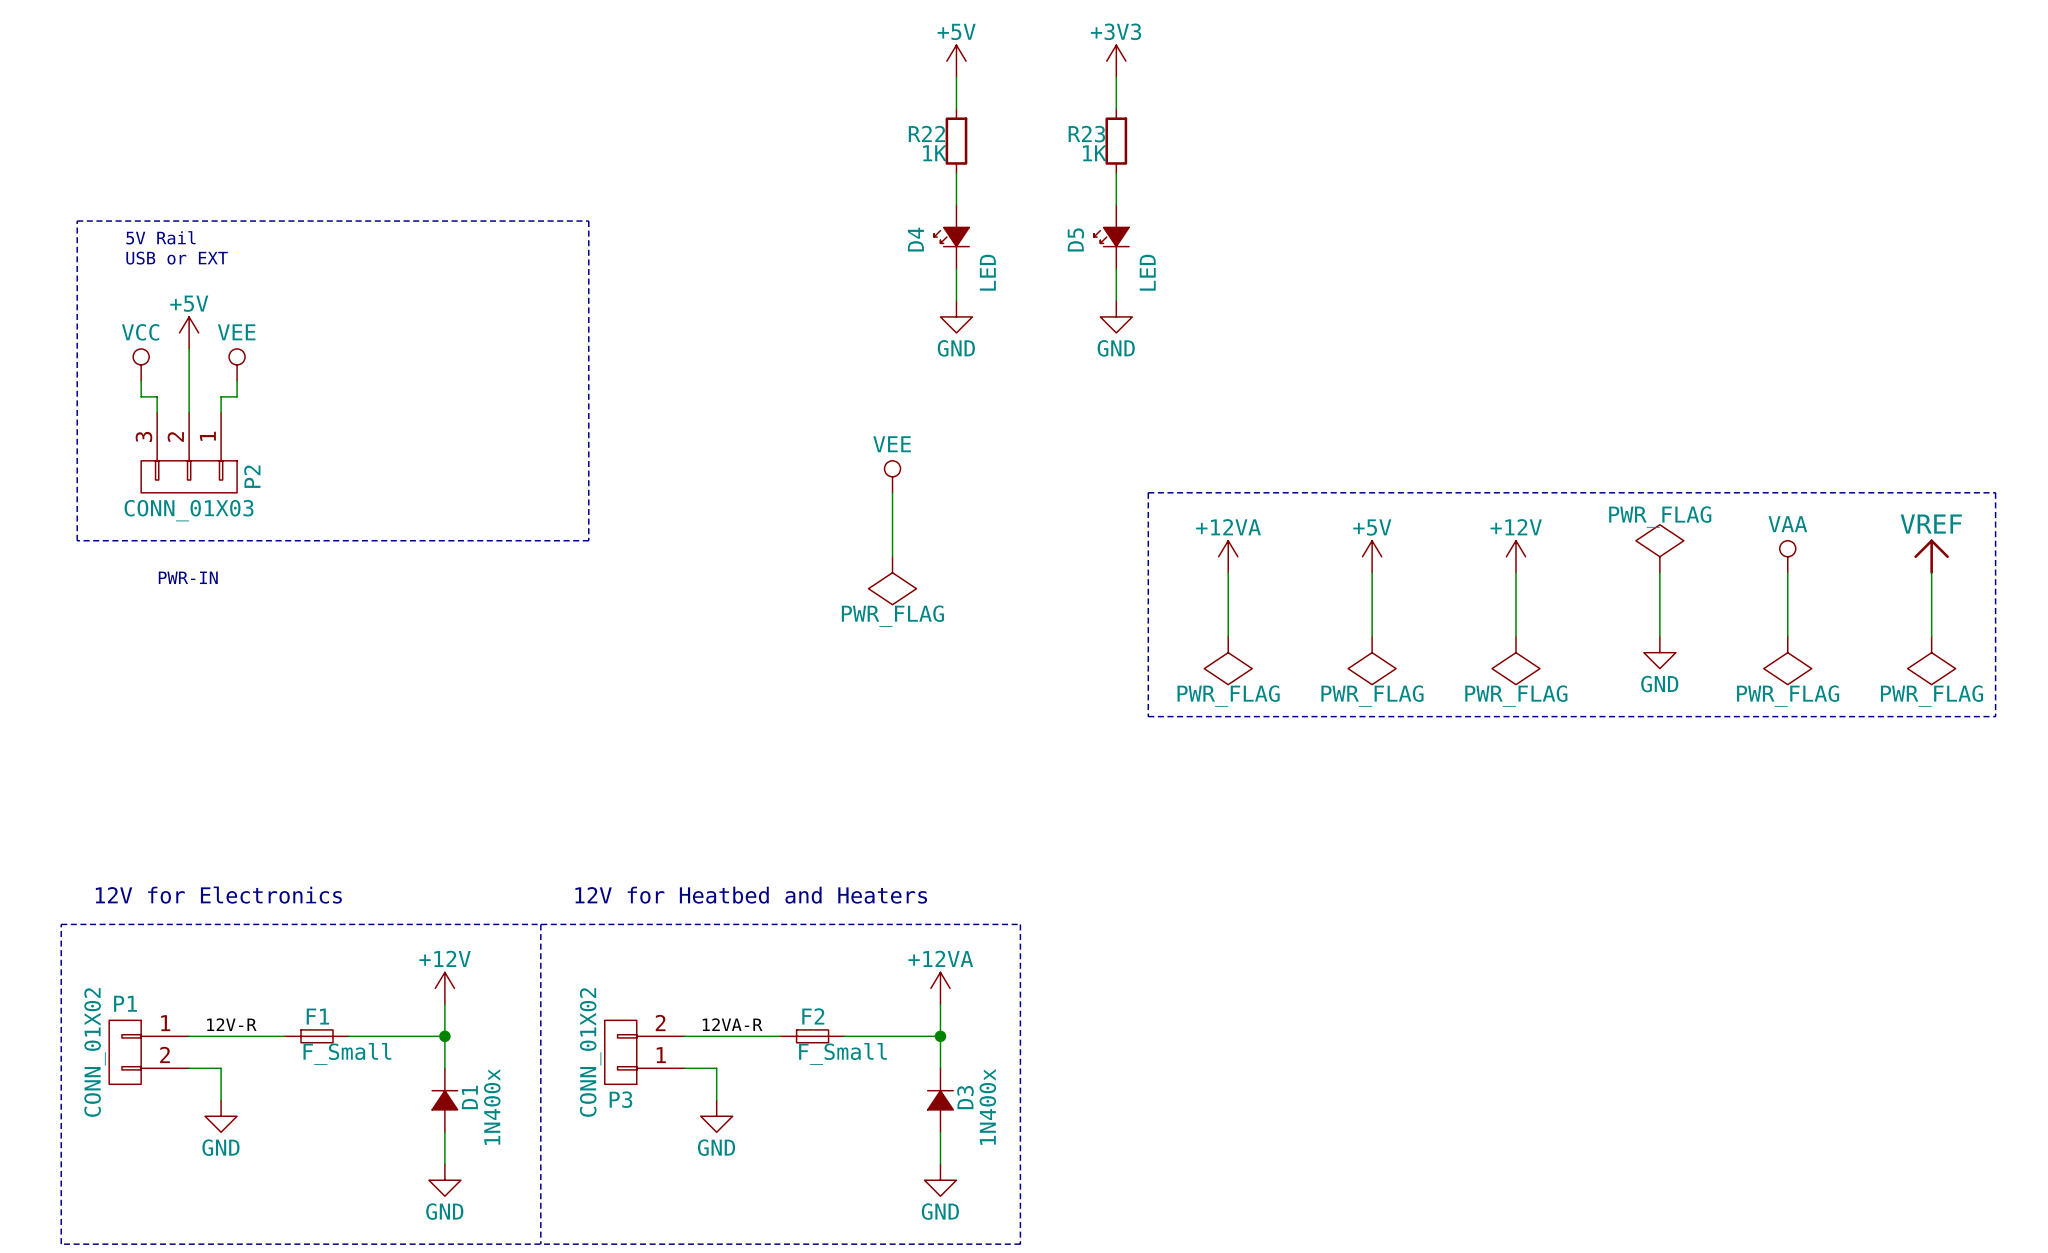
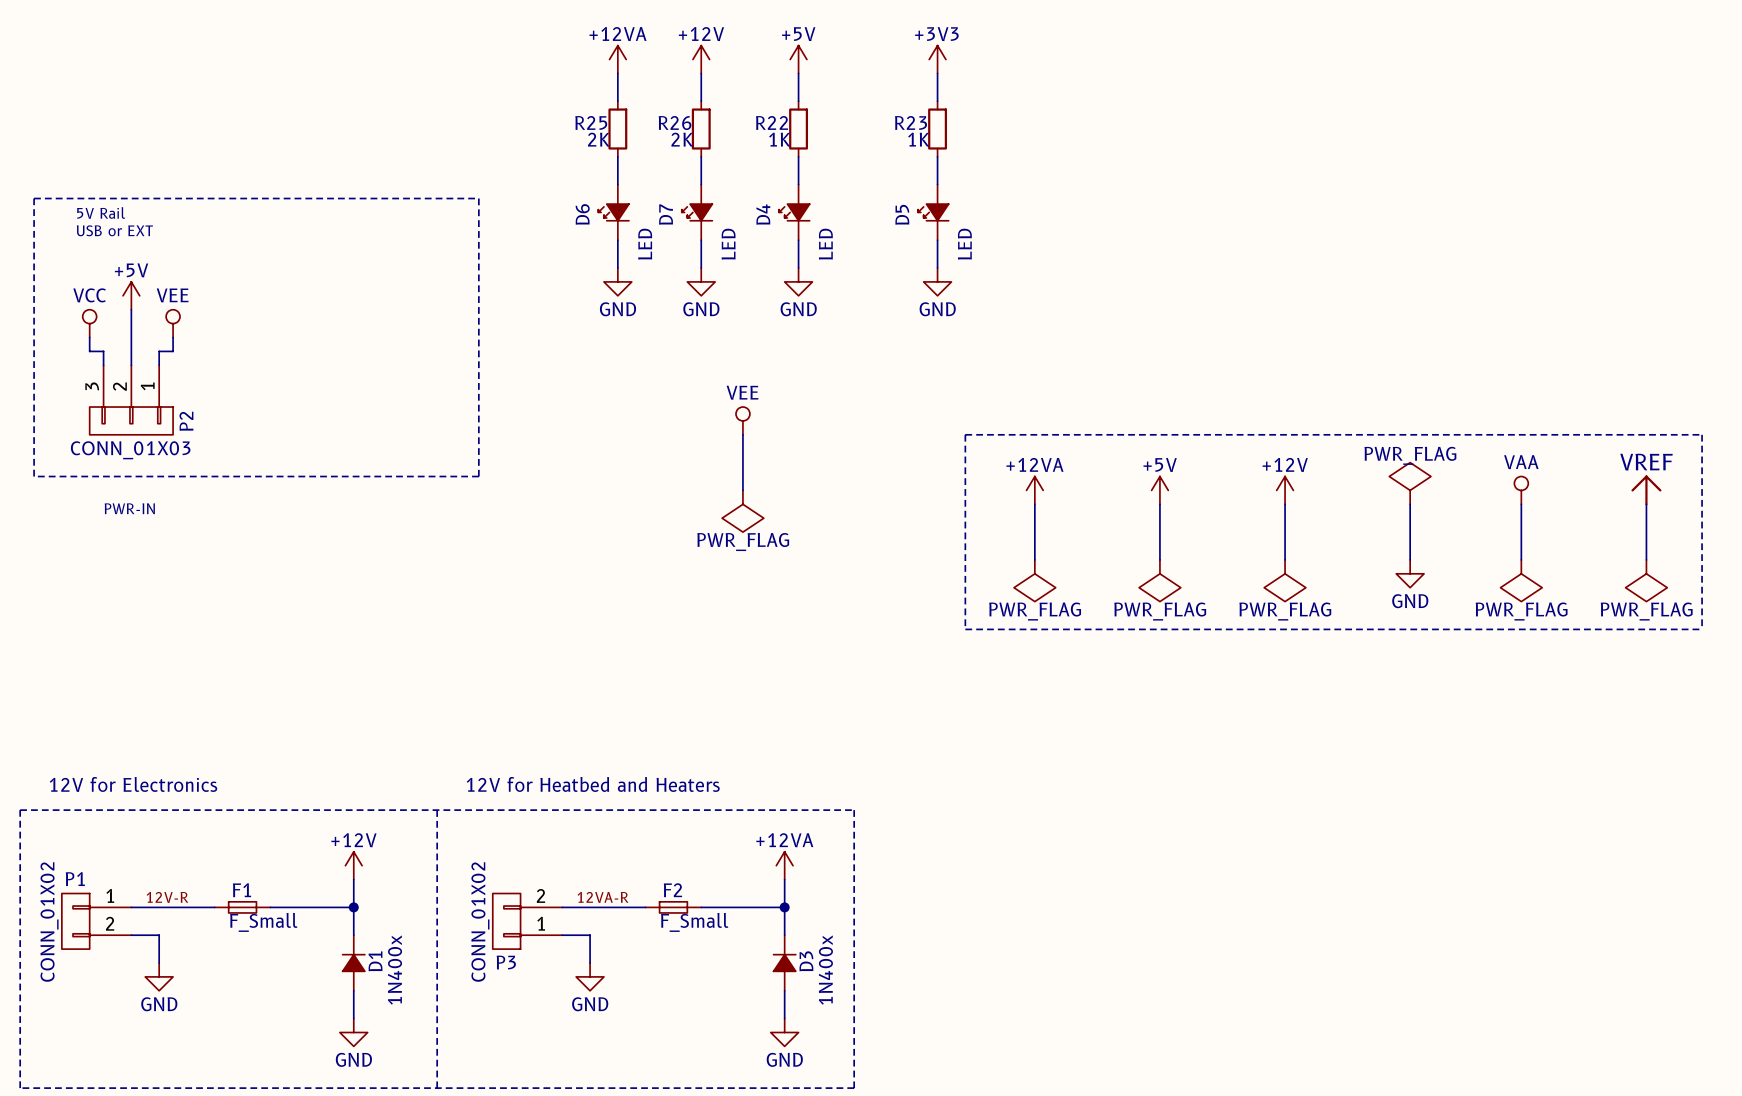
power symbol: none -> +12VA (617, 59)
power symbol: none -> +12V (701, 59)
wire: none -> (617, 73) (617, 101)
wire: none -> (701, 73) (701, 101)
R25: none -> 2K (617, 129)
R26: none -> 2K (701, 129)
wire: none -> (617, 156) (617, 184)
wire: none -> (701, 156) (701, 184)
D6: none -> LED (613, 212)
D7: none -> LED (697, 212)
wire: none -> (617, 240) (617, 268)
wire: none -> (701, 240) (701, 268)
power symbol: none -> GND (617, 281)
power symbol: none -> GND (701, 281)

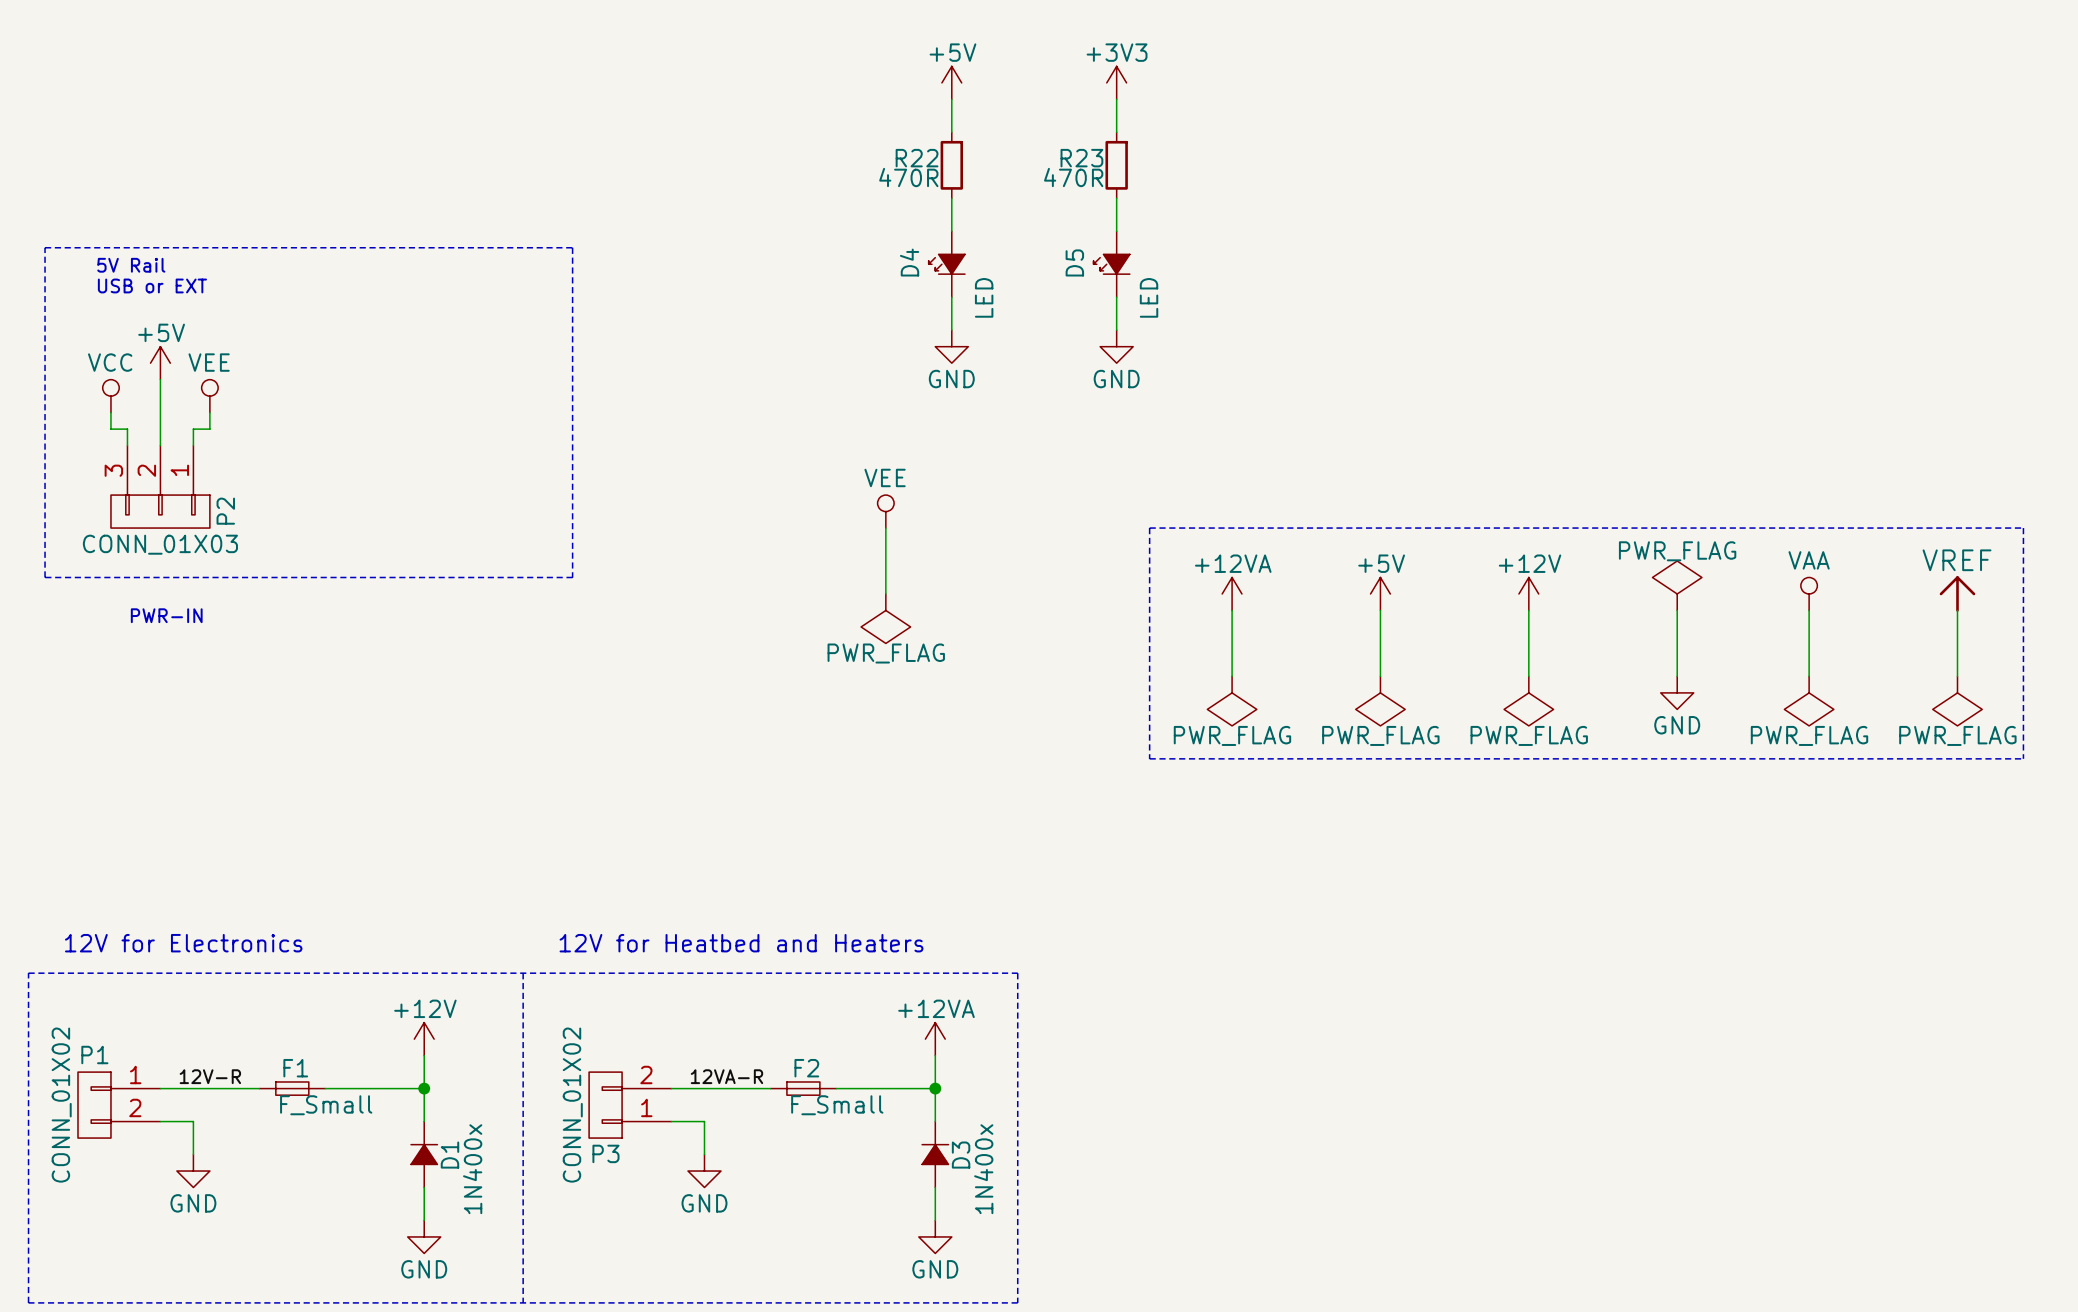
power symbol: +12VA (617, 59) -> none
power symbol: +12V (701, 59) -> none
wire: (617, 73) (617, 101) -> none
wire: (701, 73) (701, 101) -> none
R25: 2K (617, 129) -> none
R26: 2K (701, 129) -> none
R22 value: 1K (779, 139) -> 470R (908, 177)
R23 value: 1K (918, 139) -> 470R (1073, 177)
wire: (617, 156) (617, 184) -> none
wire: (701, 156) (701, 184) -> none
D6: LED (613, 212) -> none
D7: LED (697, 212) -> none
wire: (617, 240) (617, 268) -> none
wire: (701, 240) (701, 268) -> none
power symbol: GND (617, 281) -> none
power symbol: GND (701, 281) -> none

